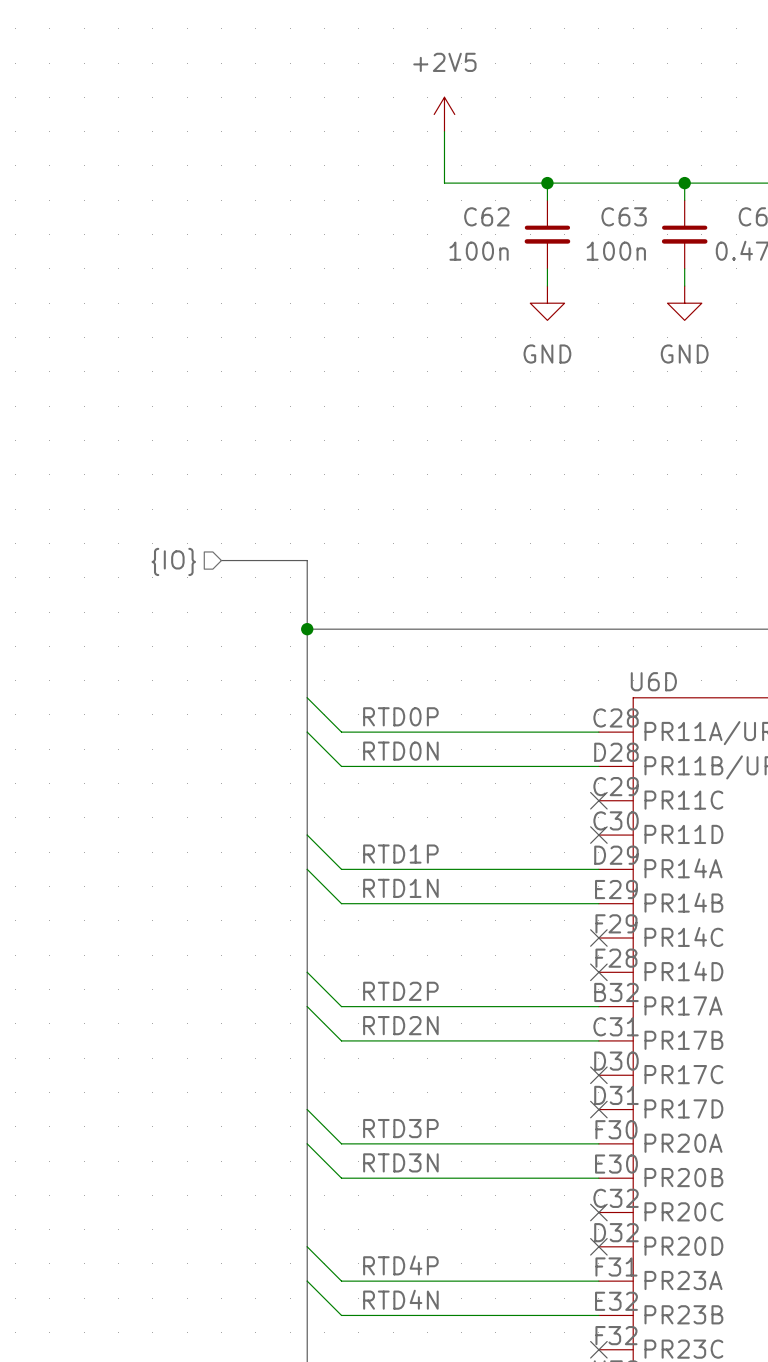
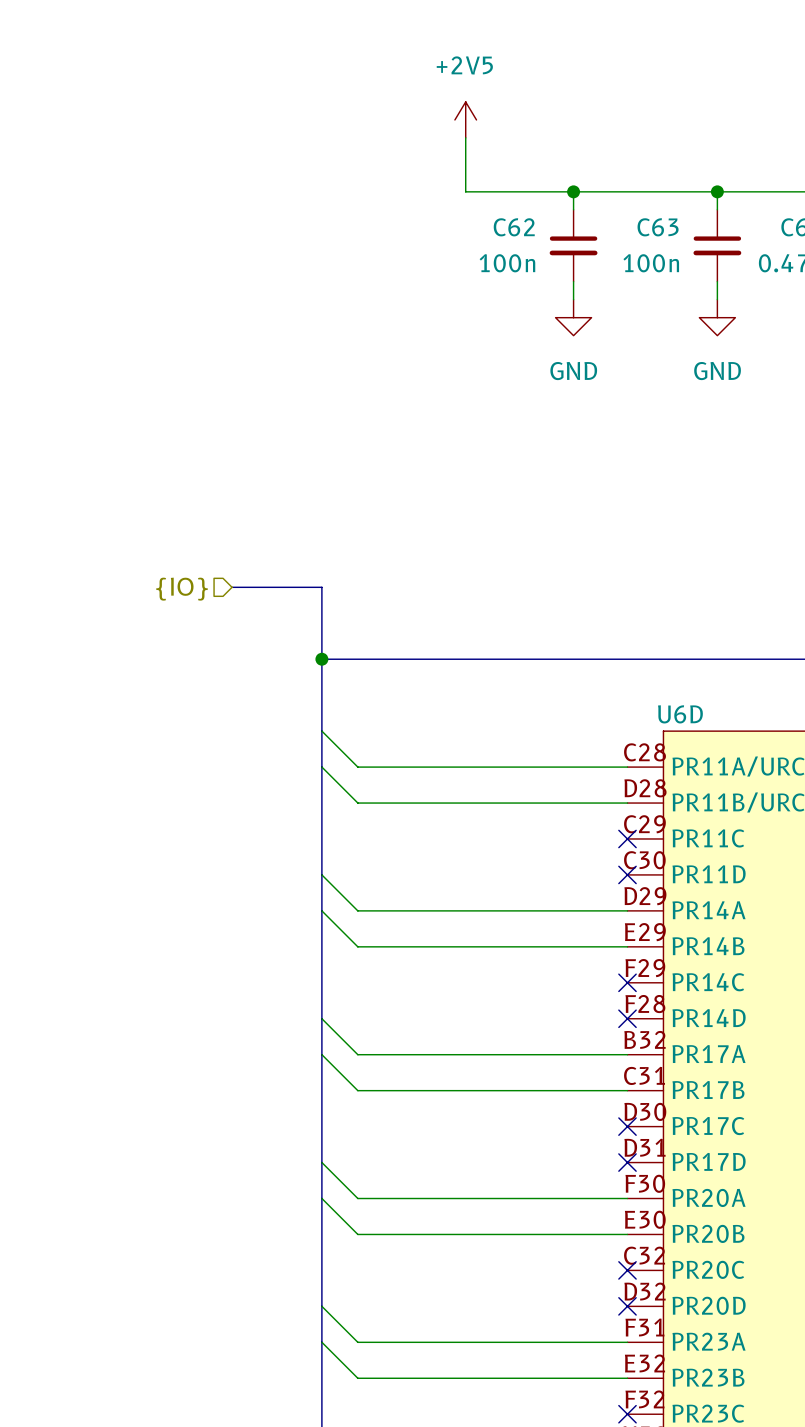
label: RTD0P (400, 716) -> none
label: RTD0N (400, 751) -> none
label: RTD1P (400, 854) -> none
label: RTD1N (400, 888) -> none
label: RTD2P (400, 991) -> none
label: RTD2N (400, 1025) -> none
label: RTD3P (400, 1128) -> none
label: RTD3N (400, 1162) -> none
label: RTD4P (400, 1265) -> none
label: RTD4N (400, 1299) -> none

